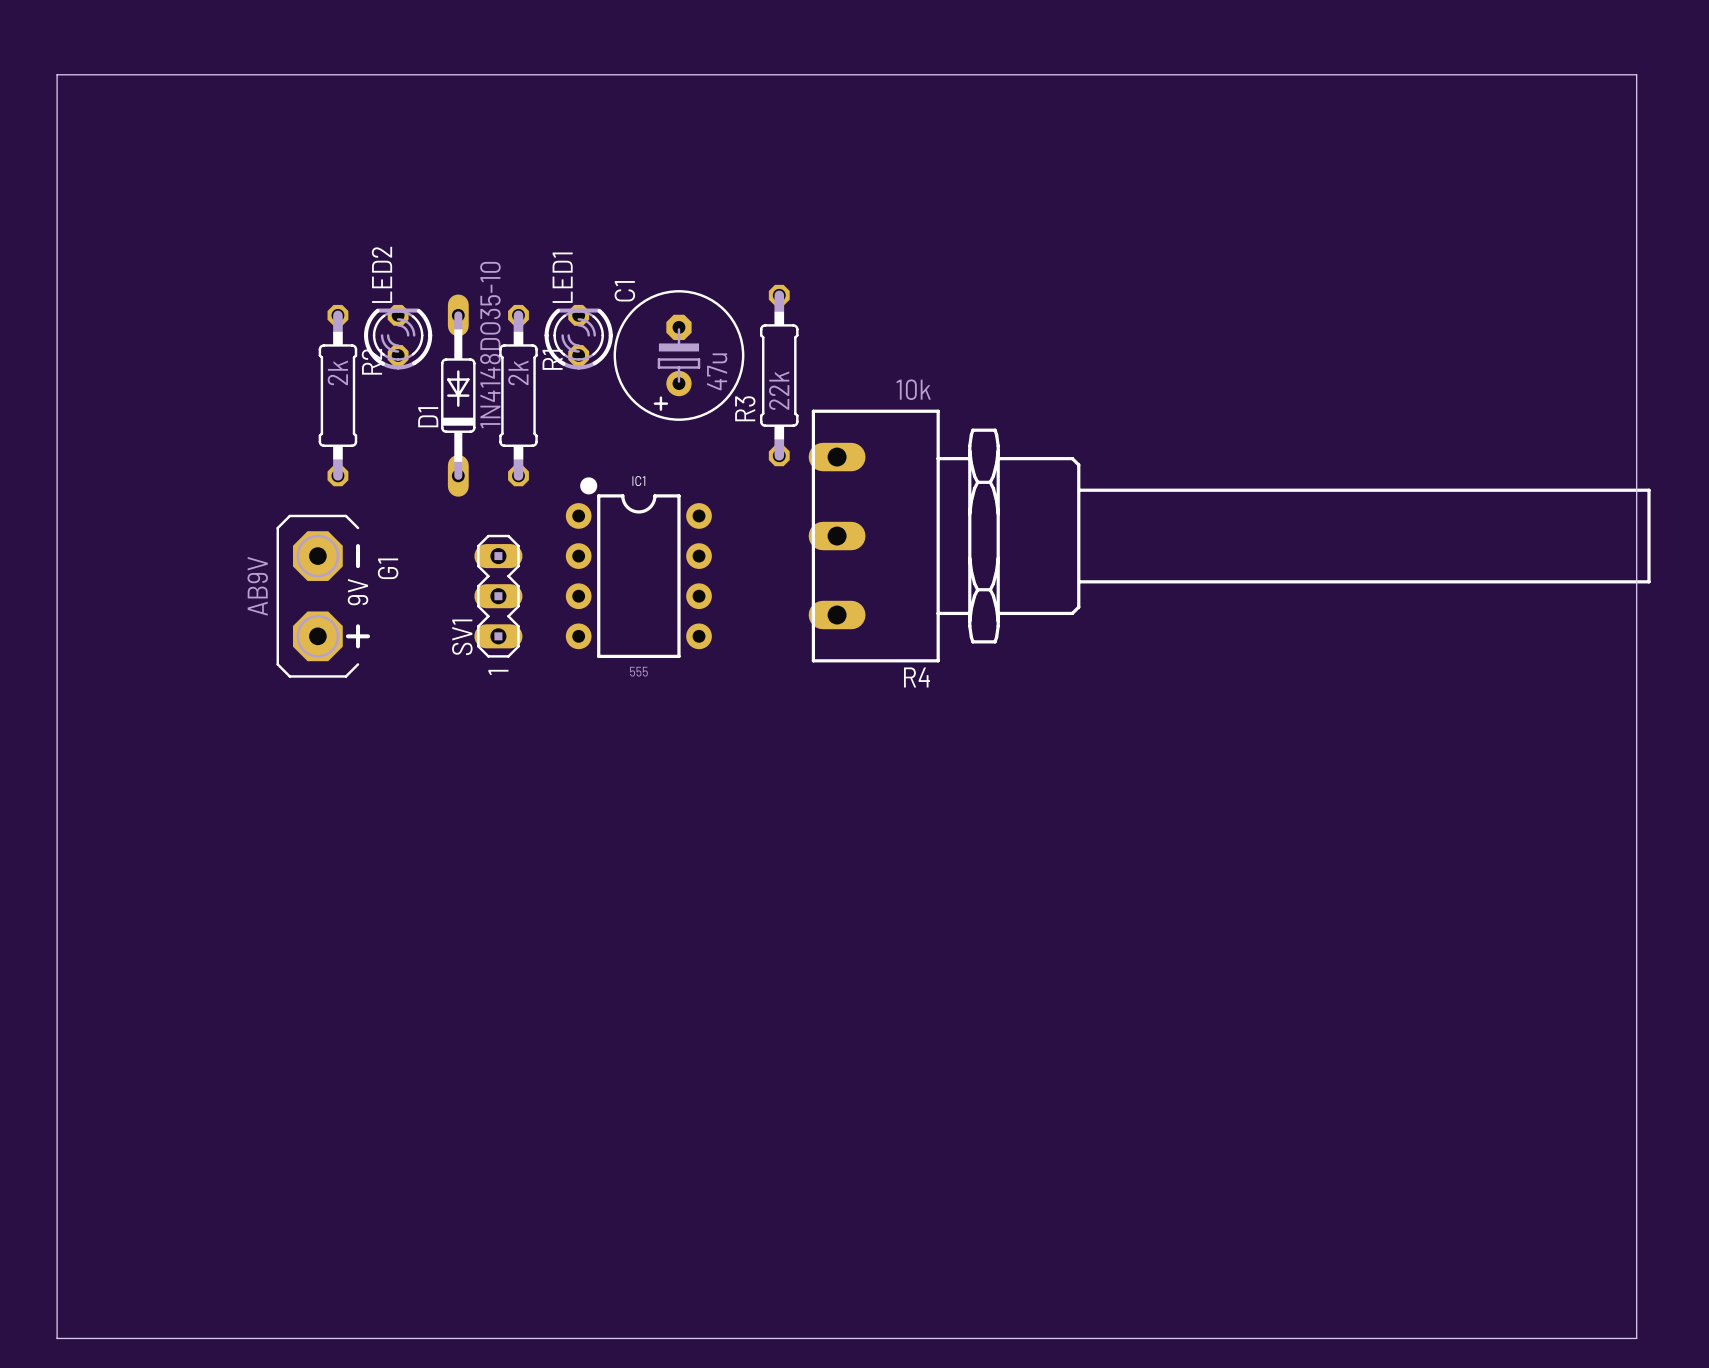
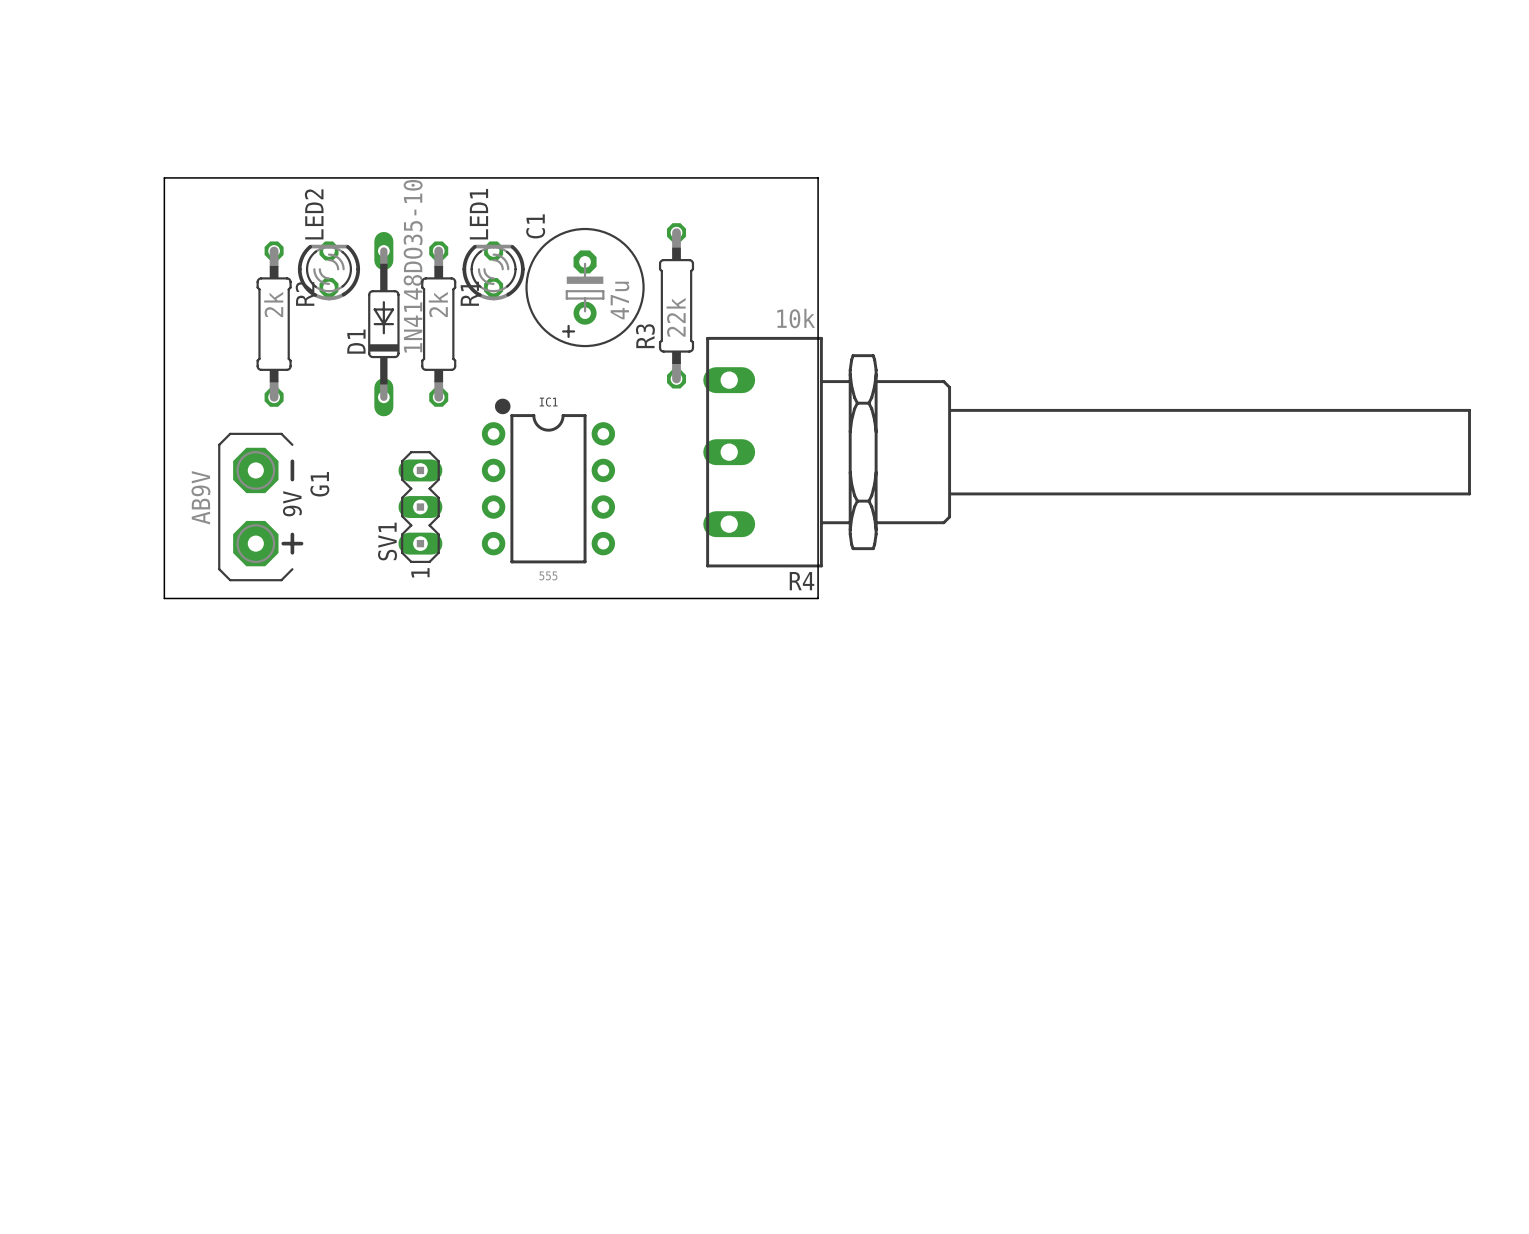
board edge: (57, 74) (1636, 74) (1636, 1338) (57, 1338) (57, 74) -> none
board edge: none -> (164, 177) (818, 177) (818, 598) (164, 598) (164, 177)

